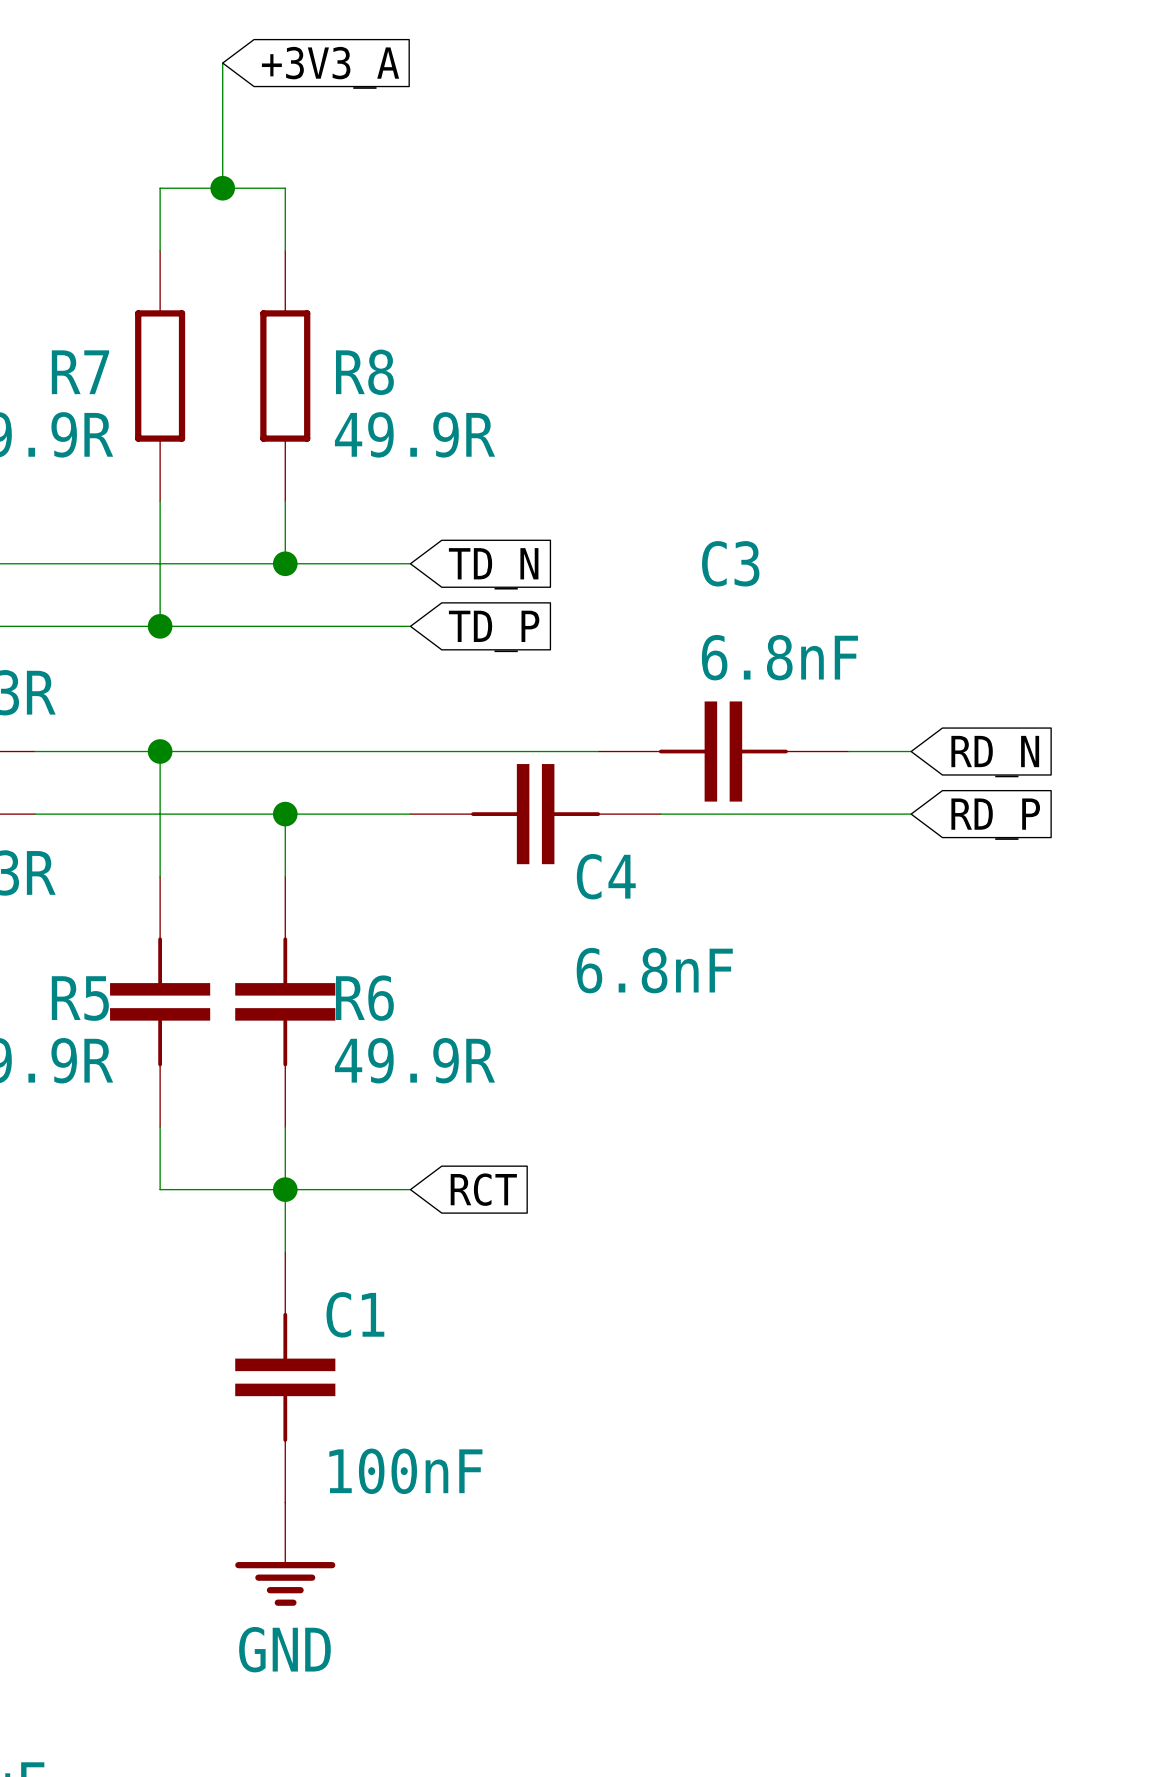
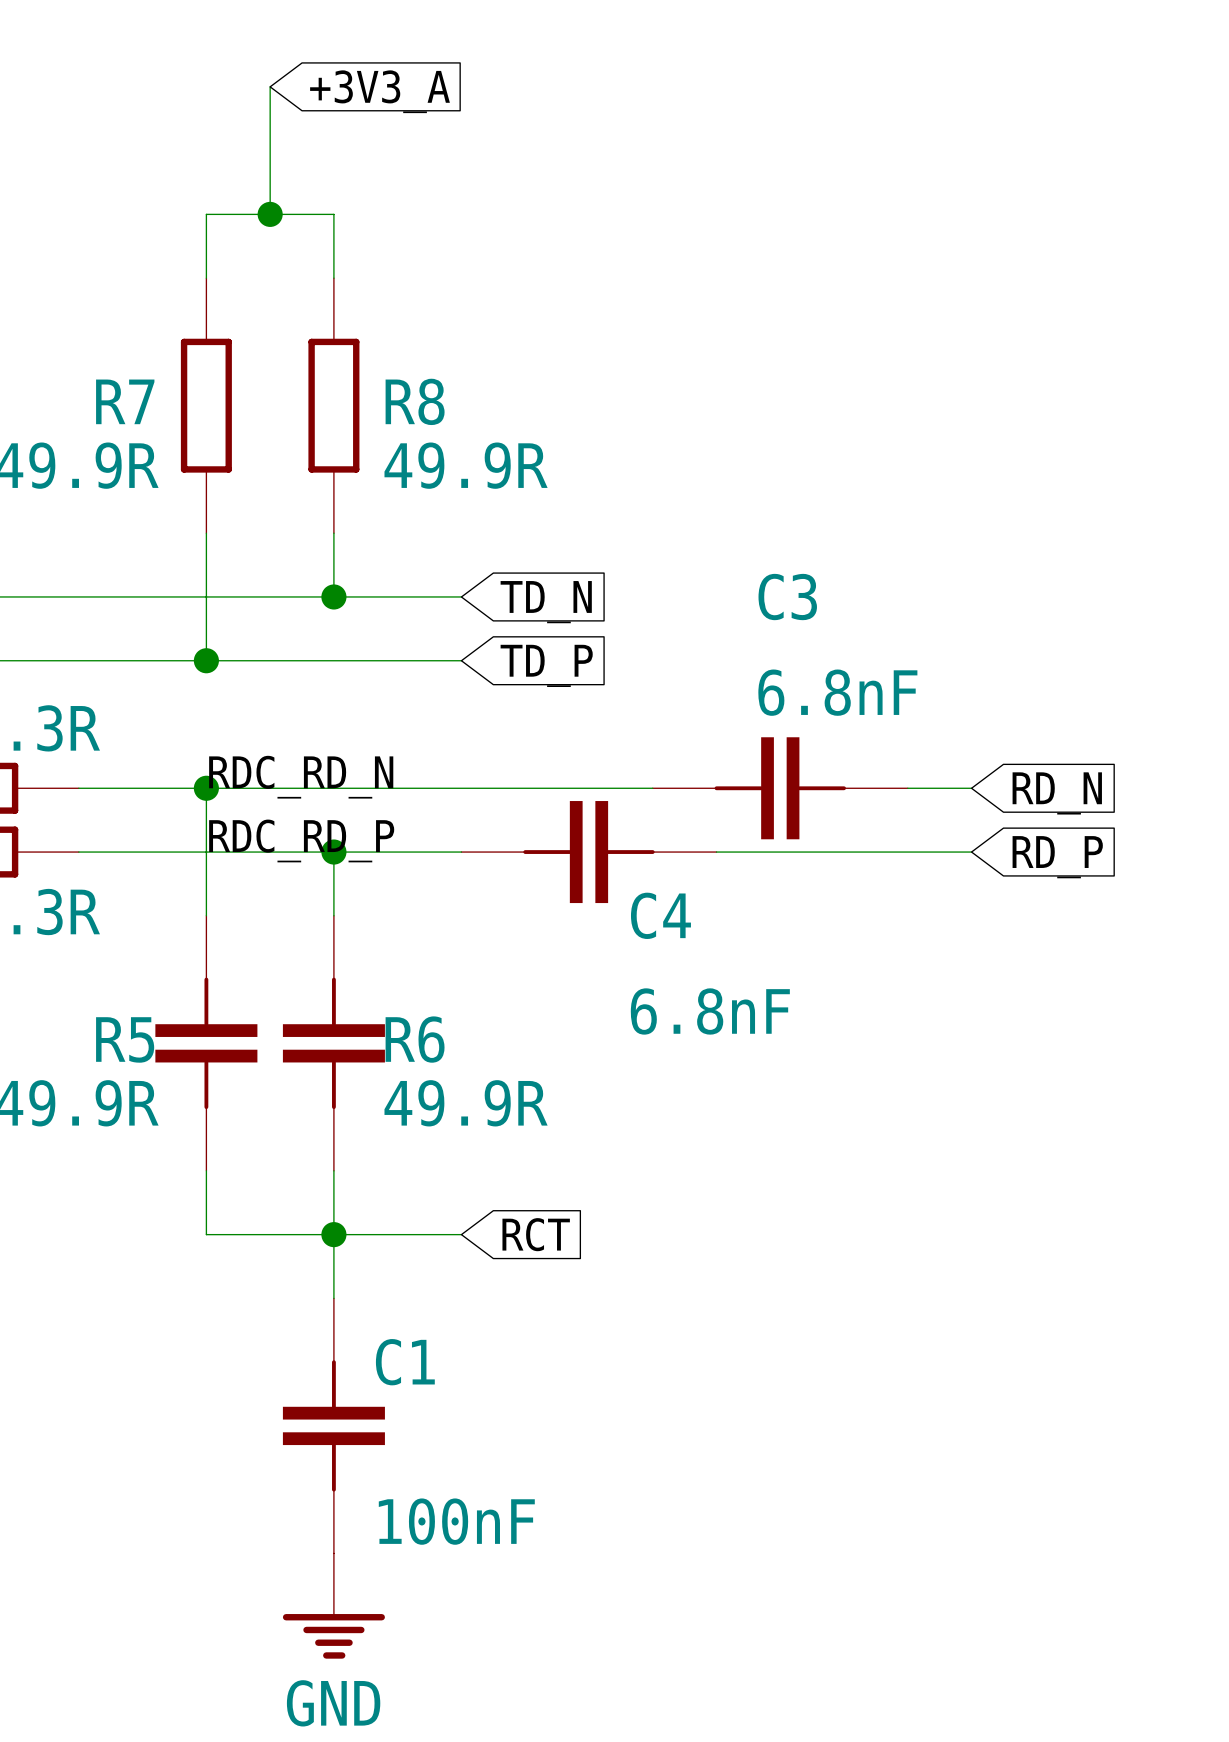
label: none -> RDC_RD_N (301, 777)
label: none -> RDC_RD_P (301, 840)

